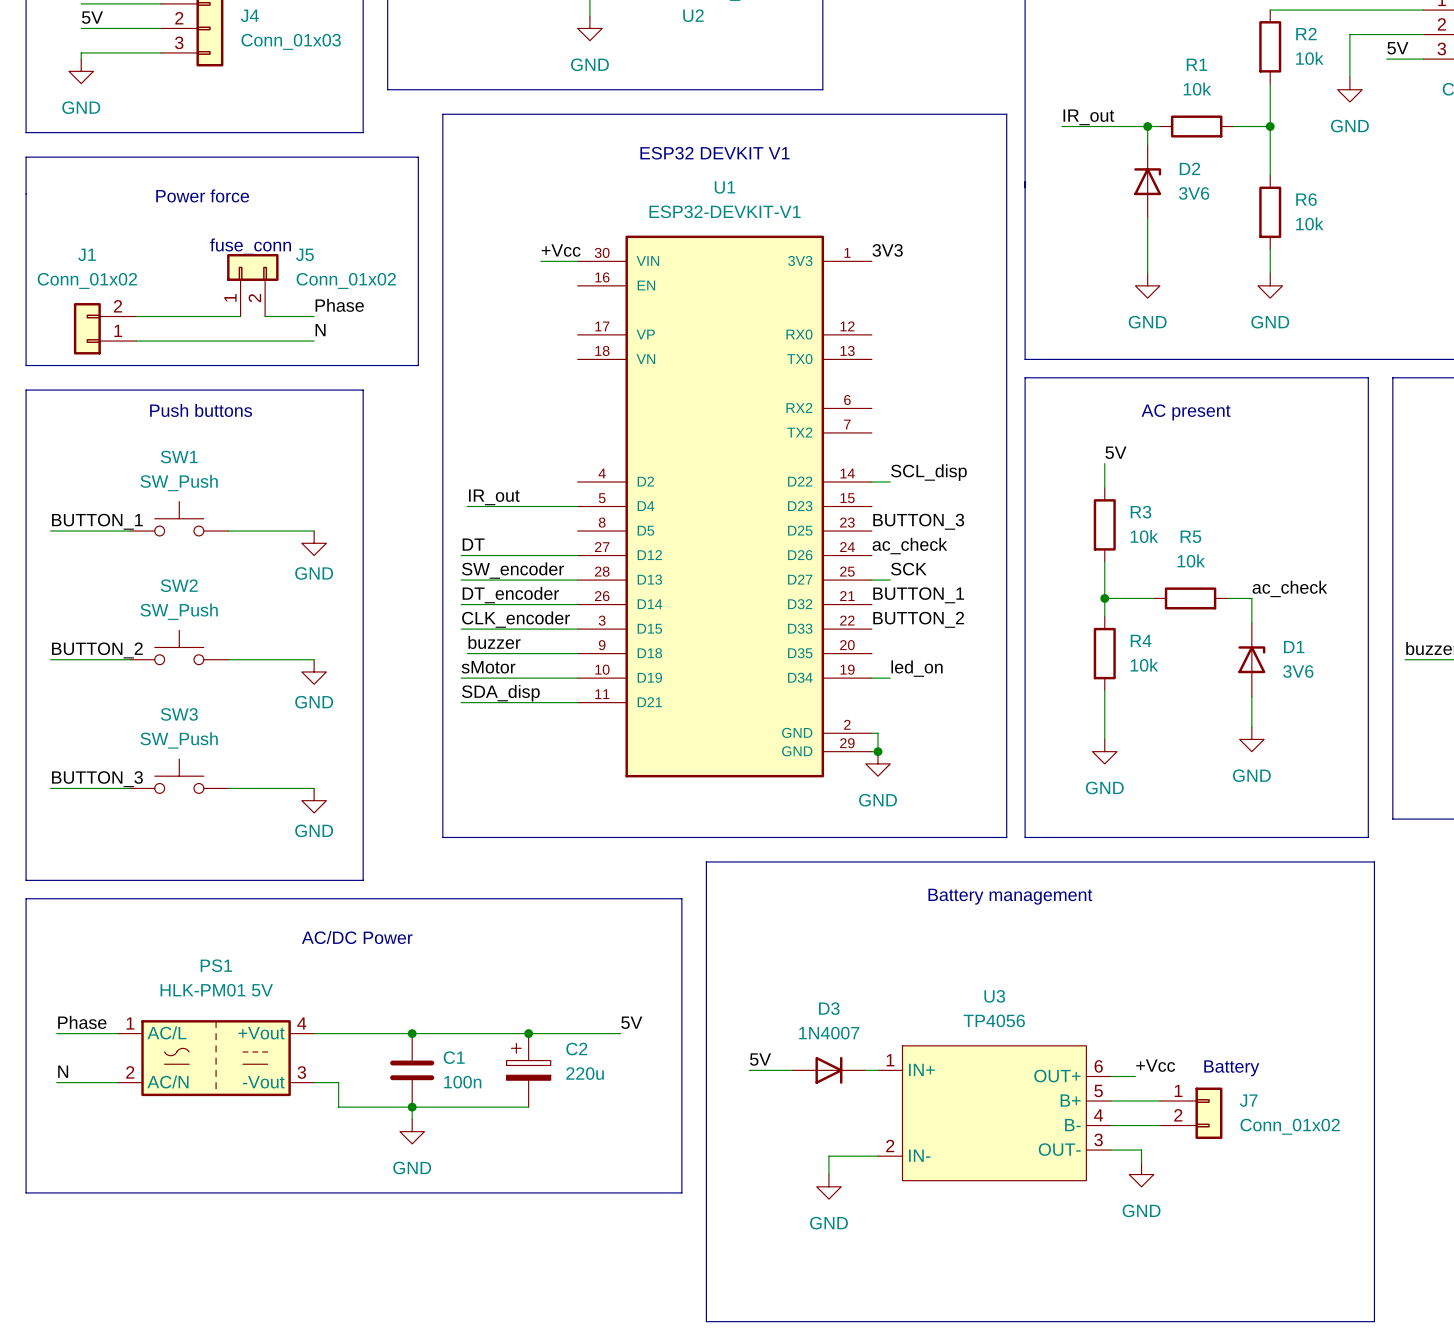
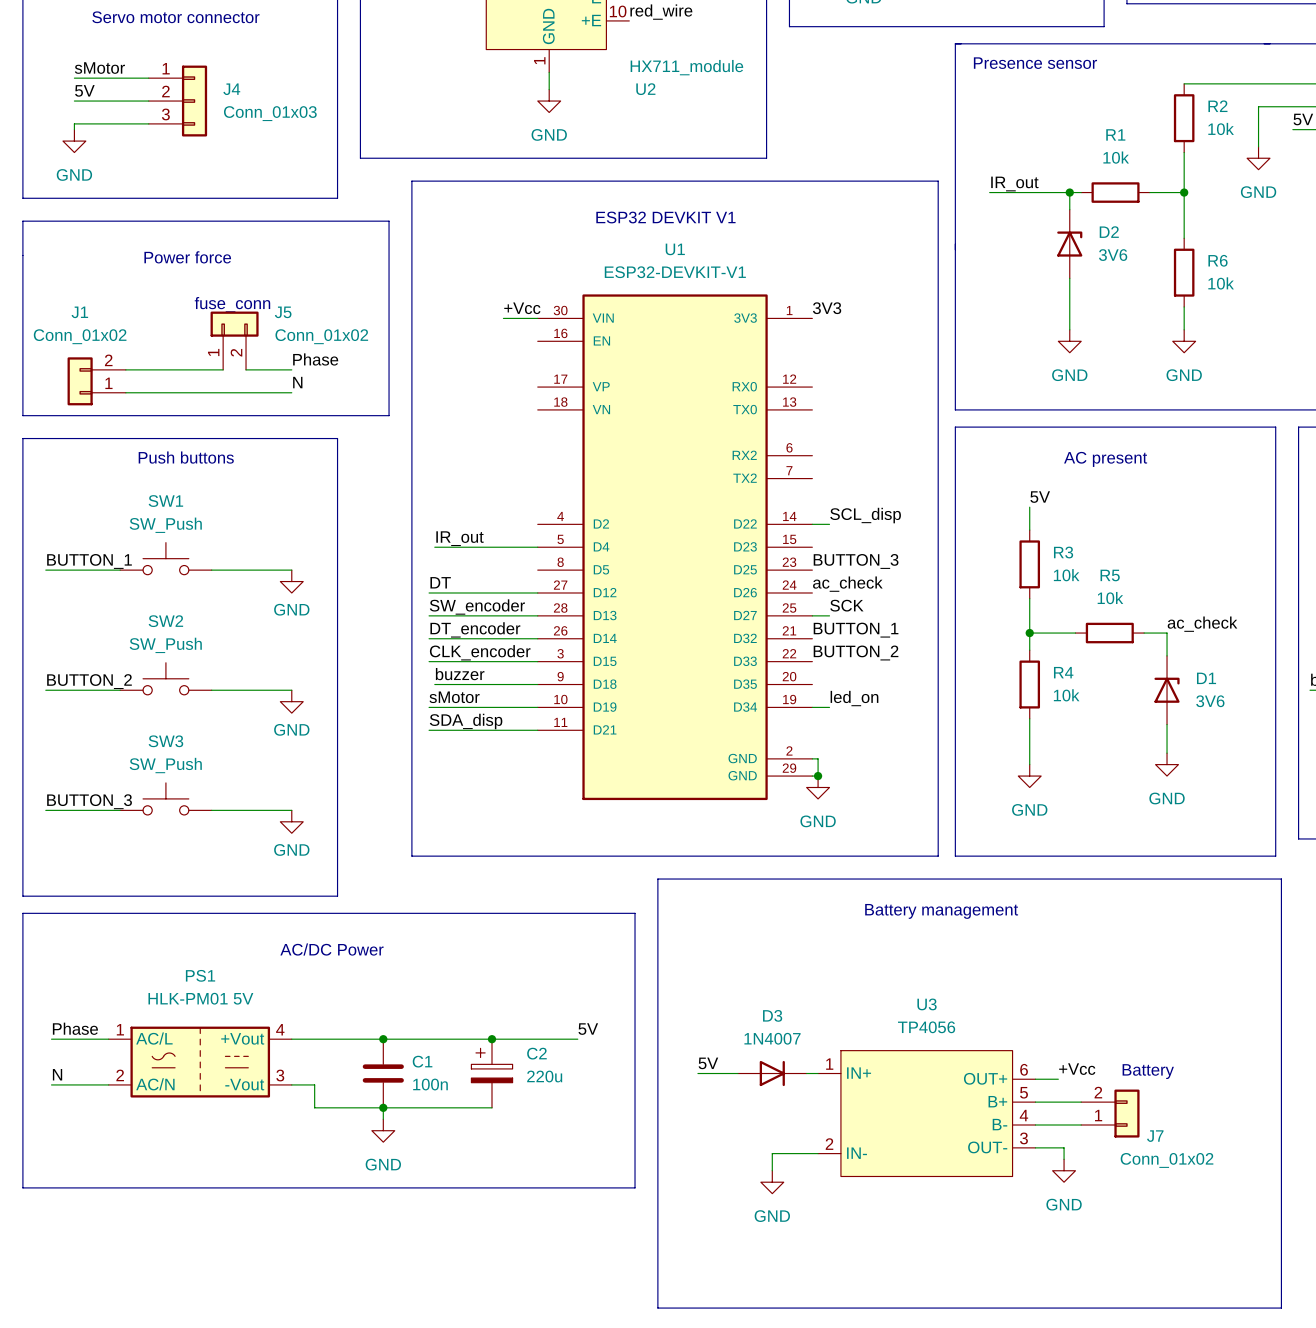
J7 flip: as is (1208, 1113) -> up-down (1126, 1113)
J7 value position: Conn_01x02 (1290, 1126) -> Conn_01x02 (1167, 1160)

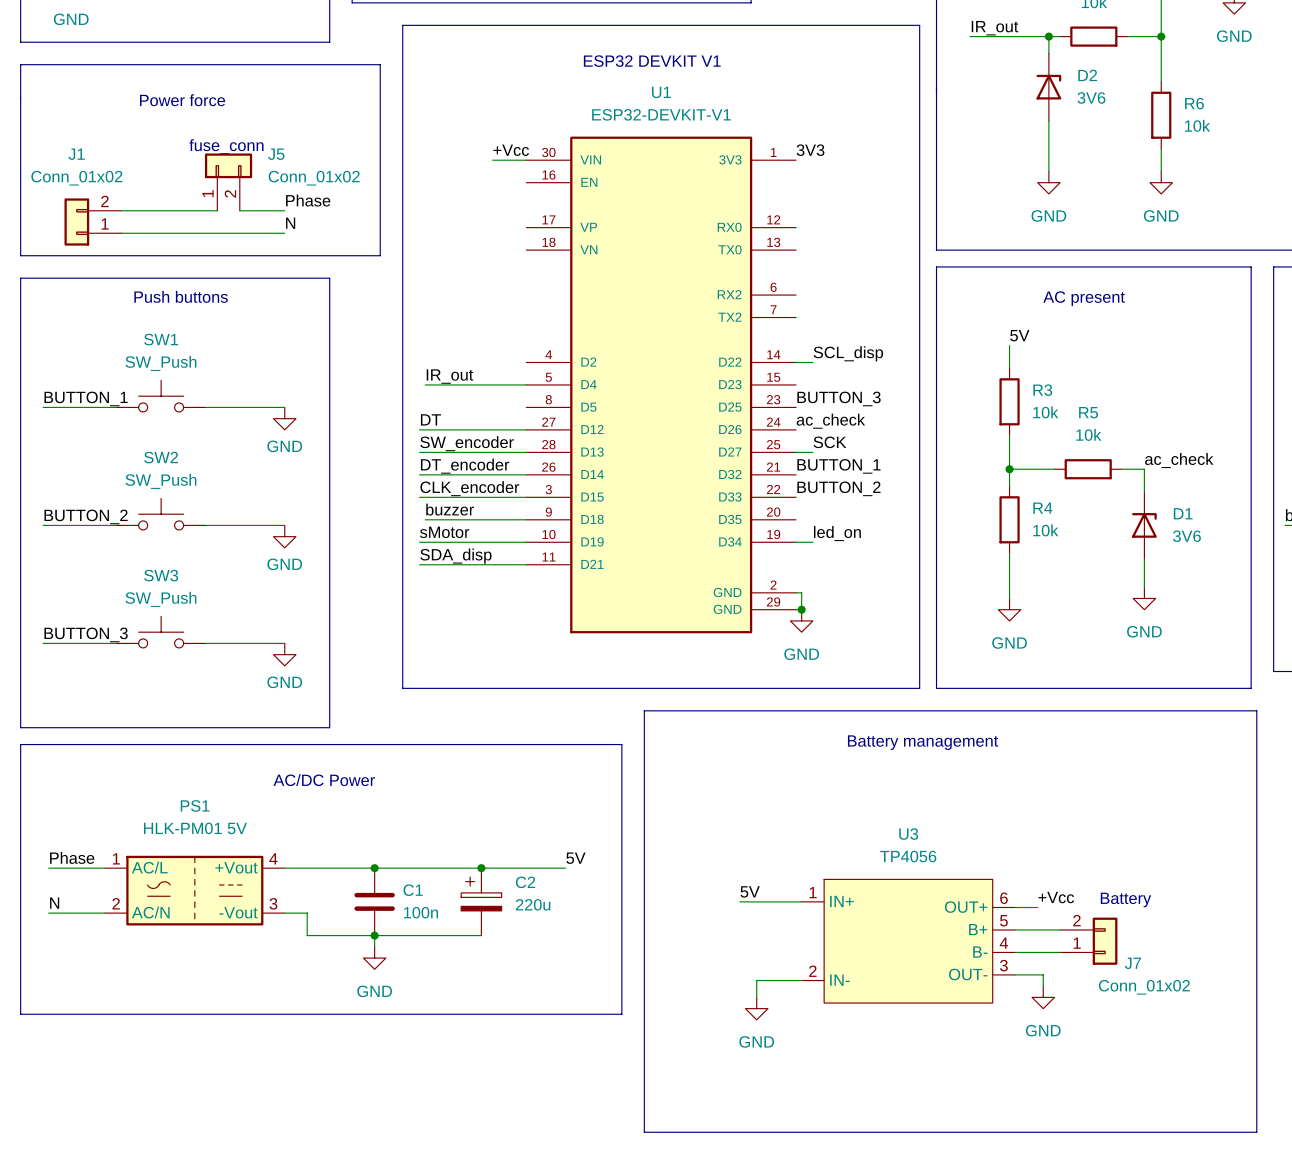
label position: 5V (708, 1063) -> 5V (750, 891)
wire: (697, 1073) (737, 1073) -> none
D3: 1N4007 (772, 1073) -> none

